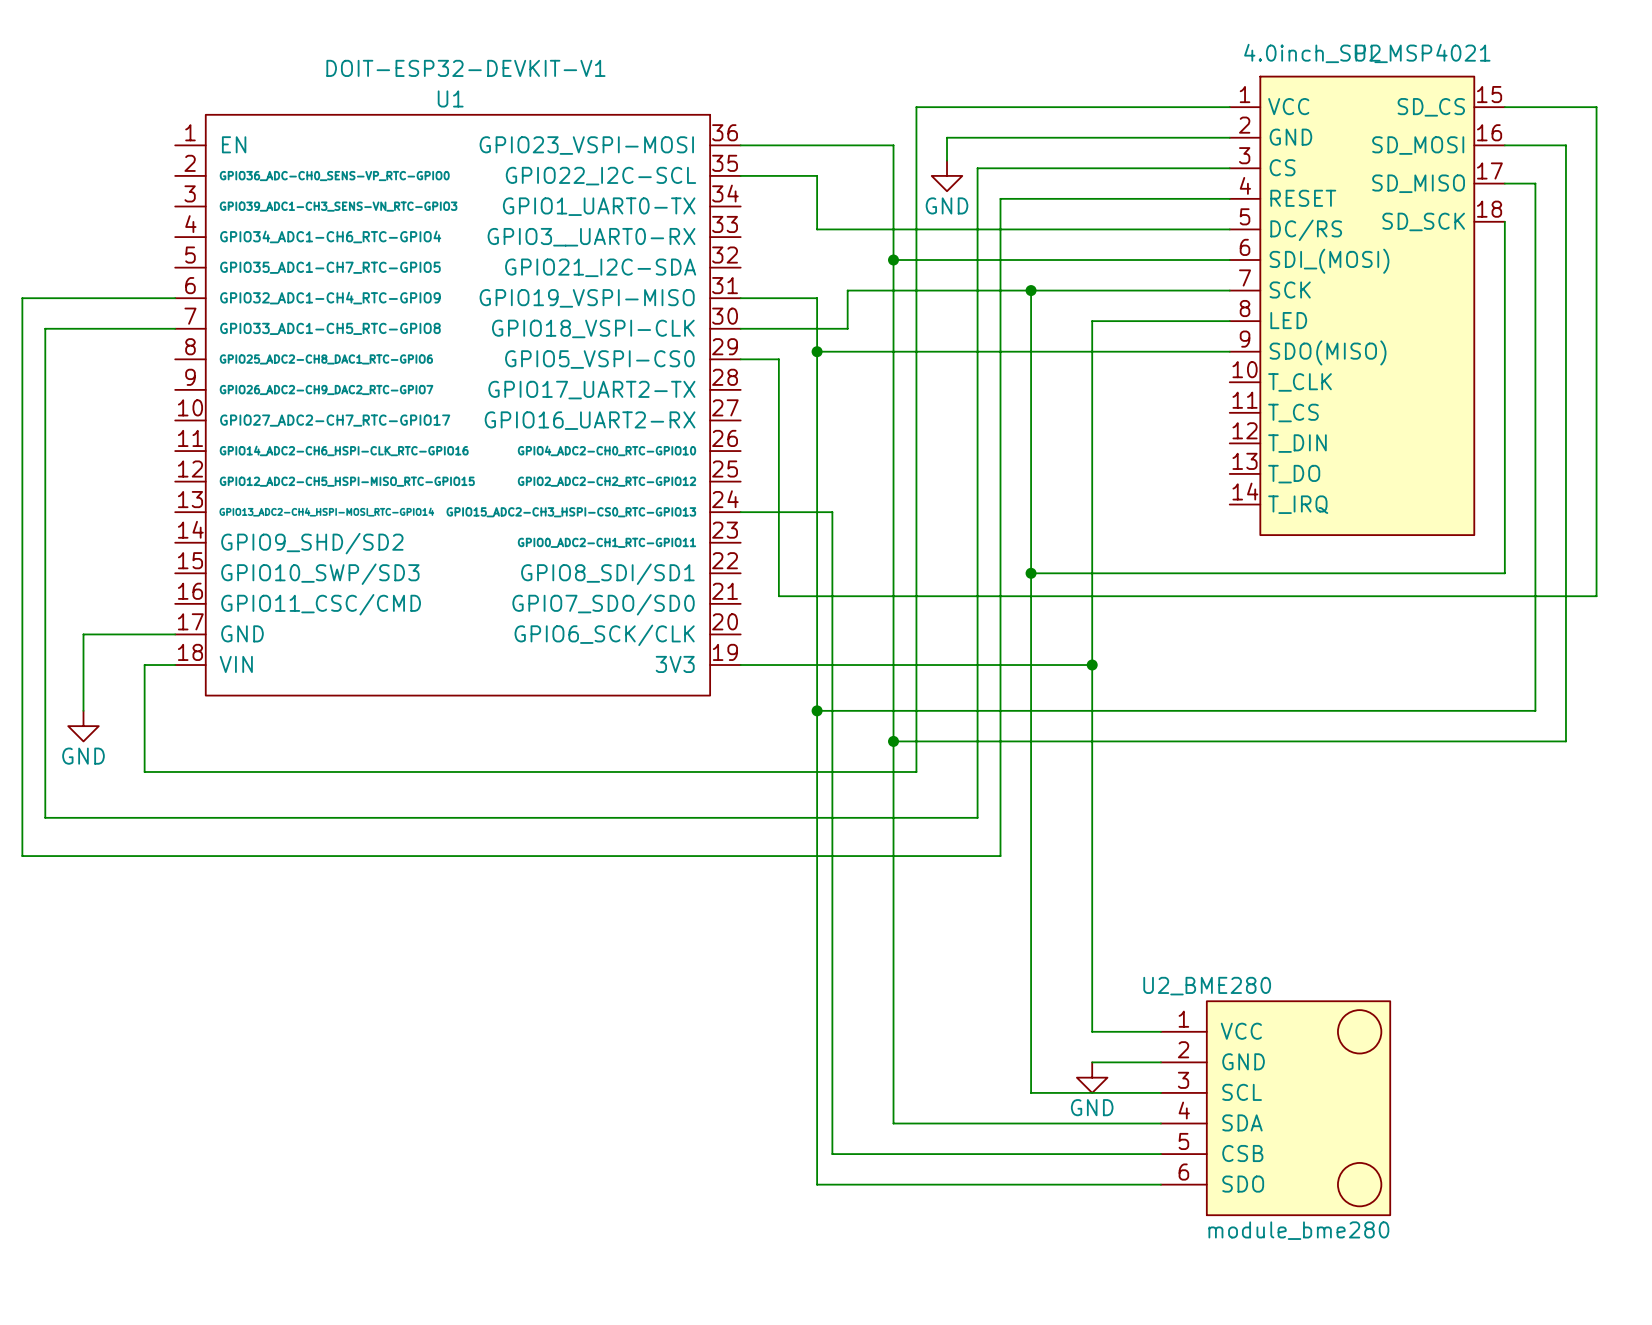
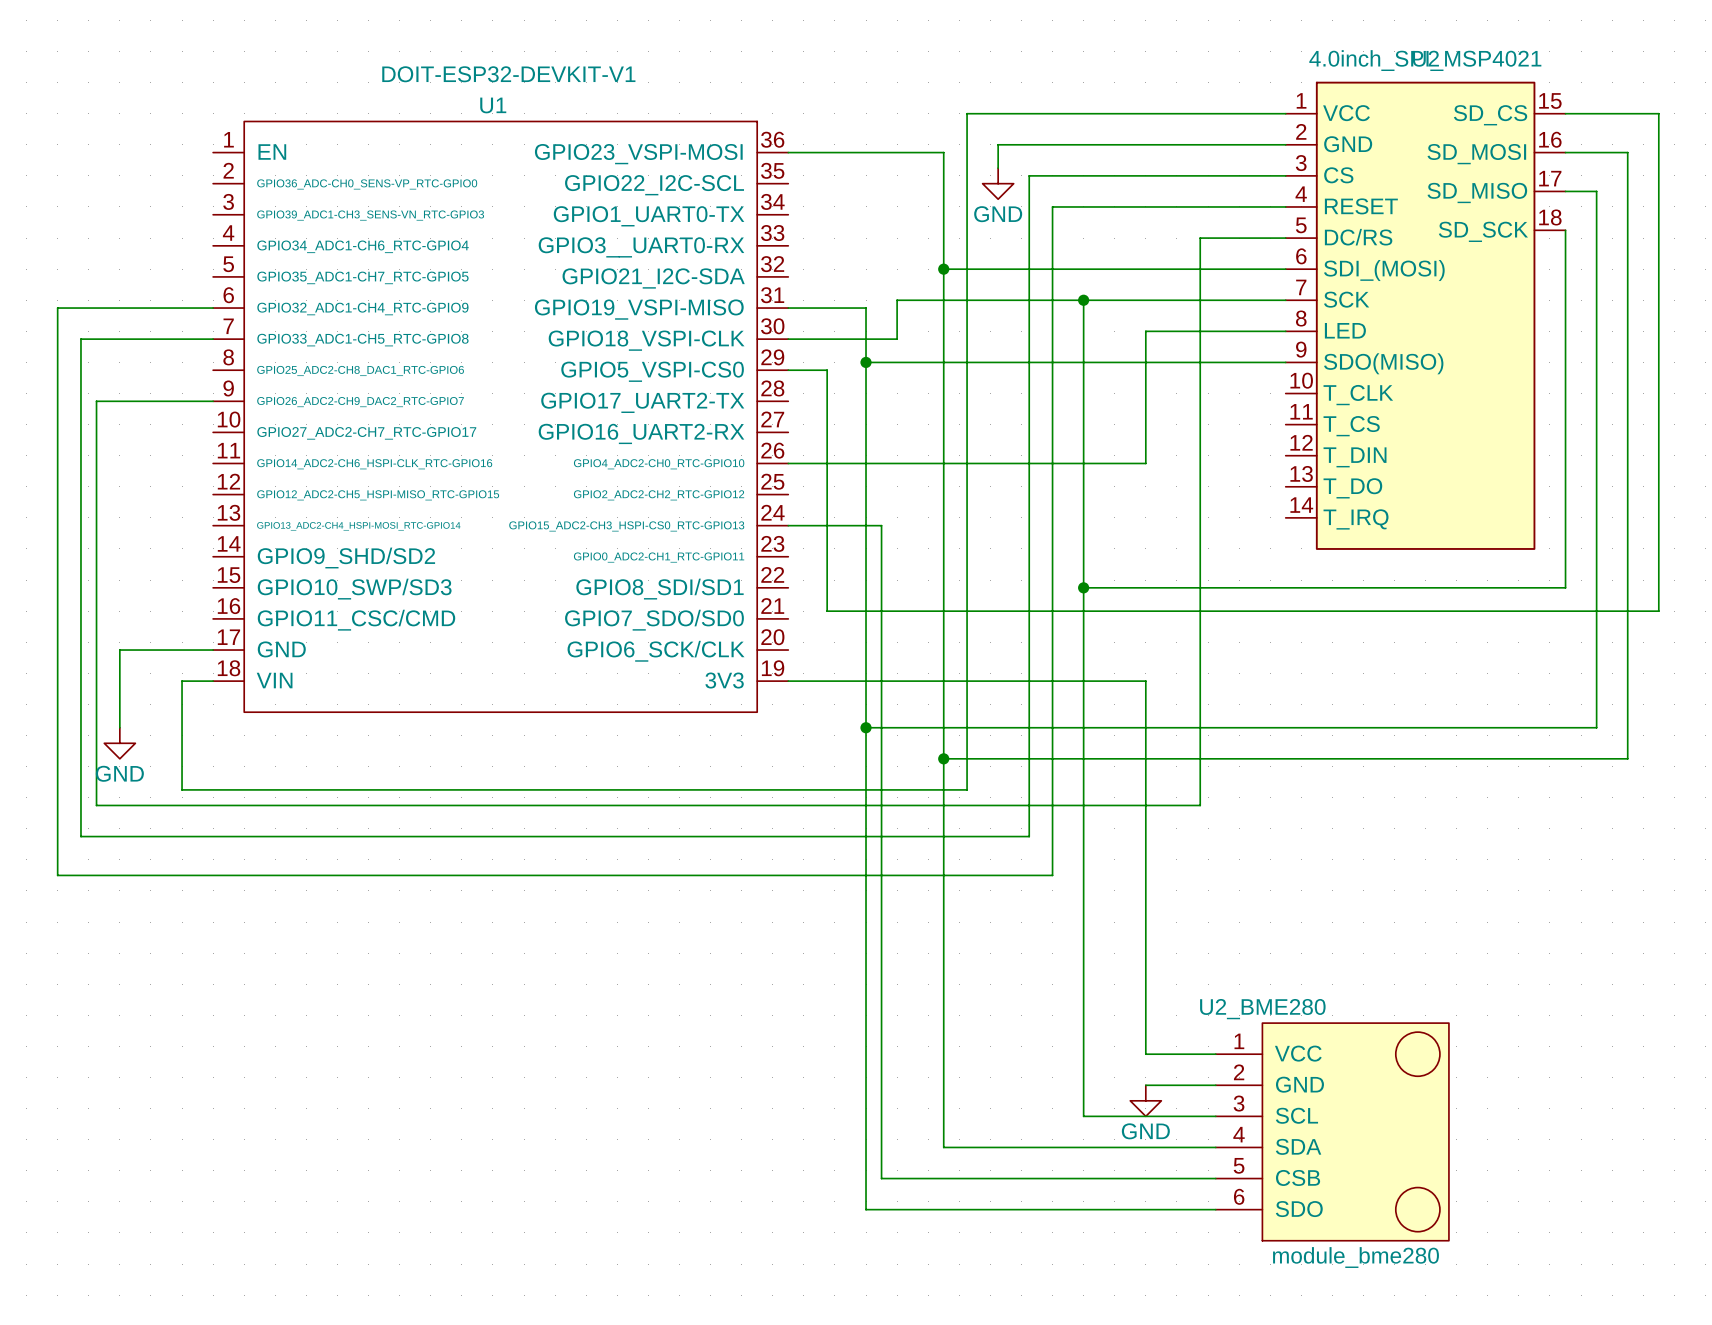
wire: (740, 175) (817, 175) (817, 229) (1145, 229) -> (213, 401) (96, 401) (96, 805) (1200, 805) (1200, 238)
wire: (1092, 451) (1092, 665) -> (1145, 463) (788, 463)
junction: (1092, 665) -> none

